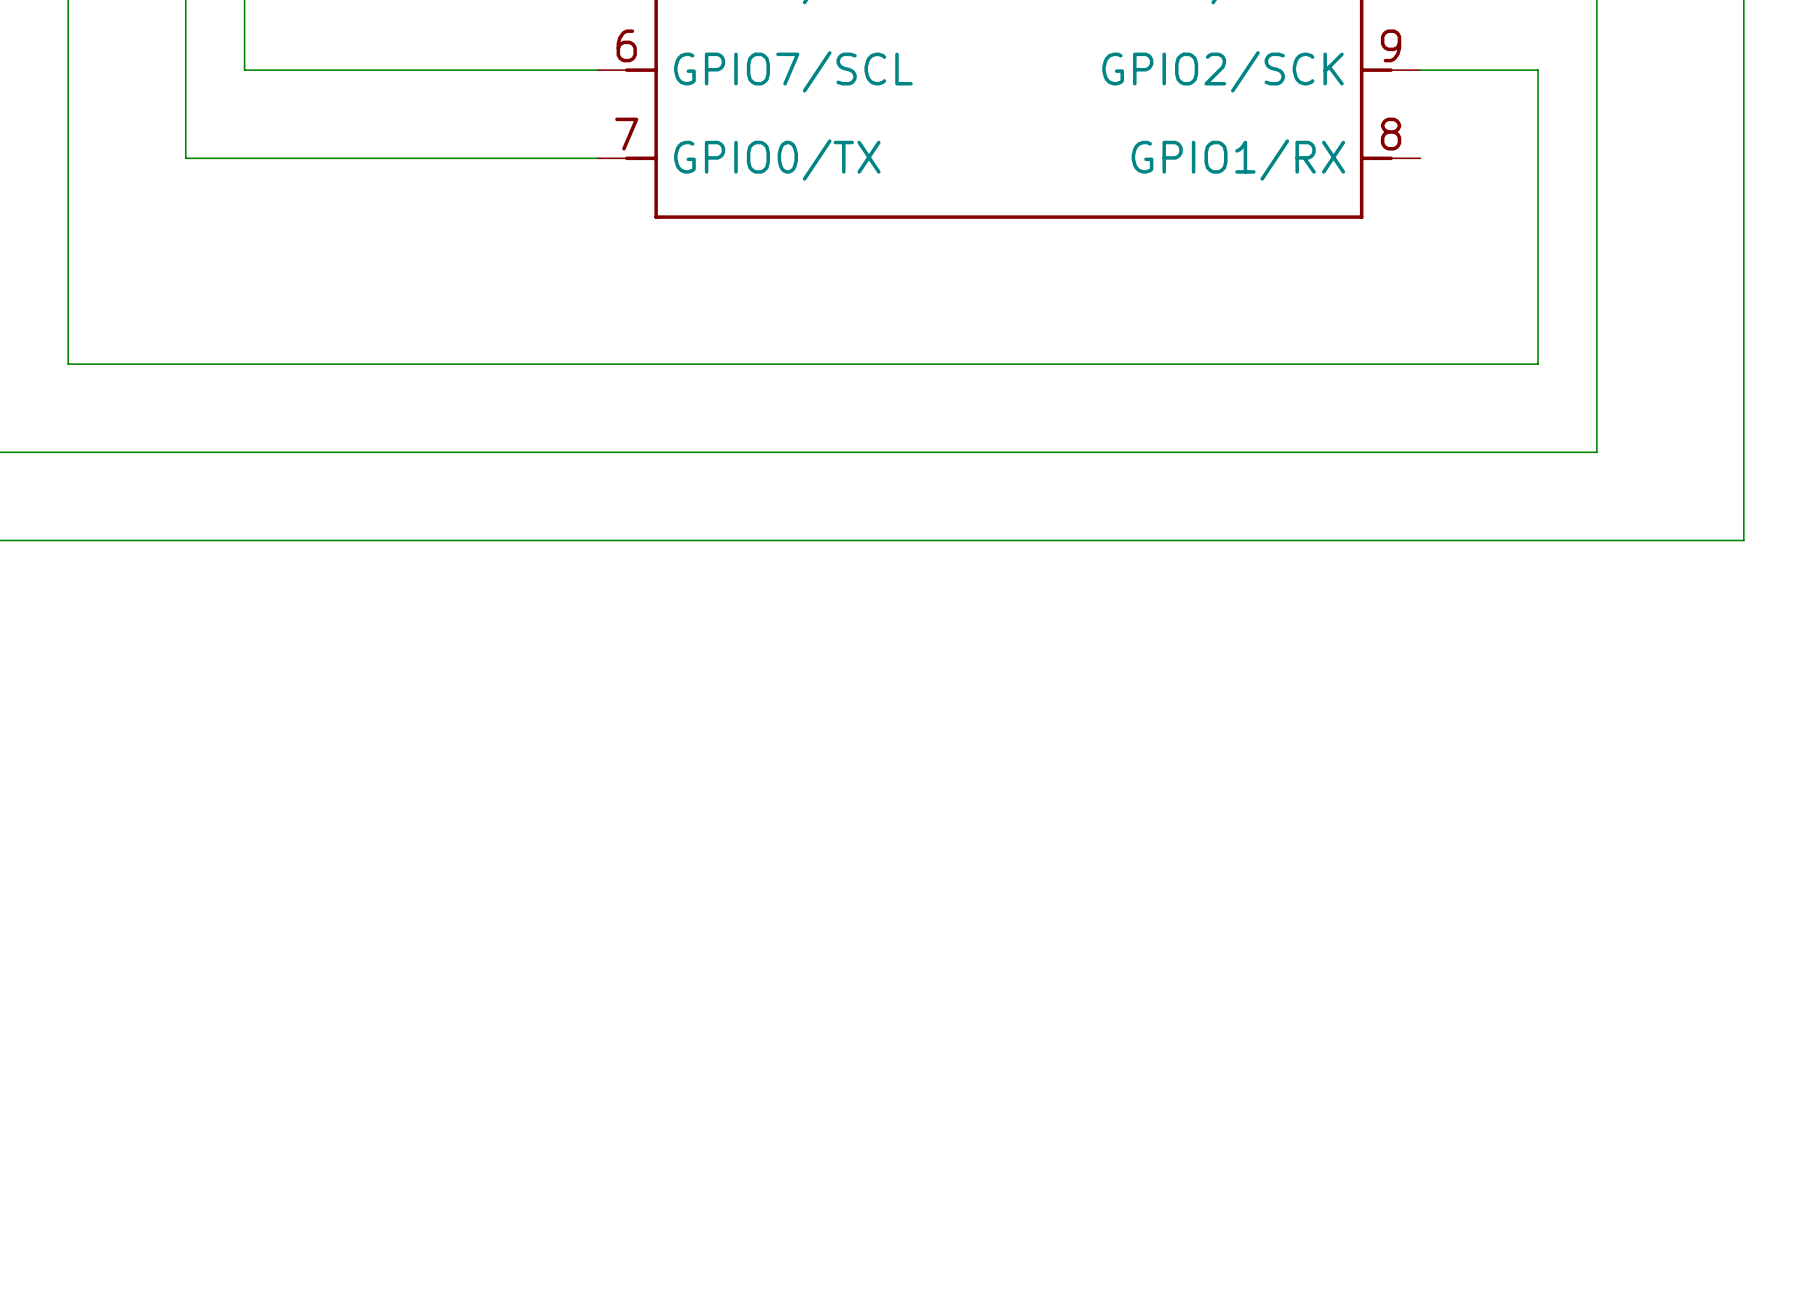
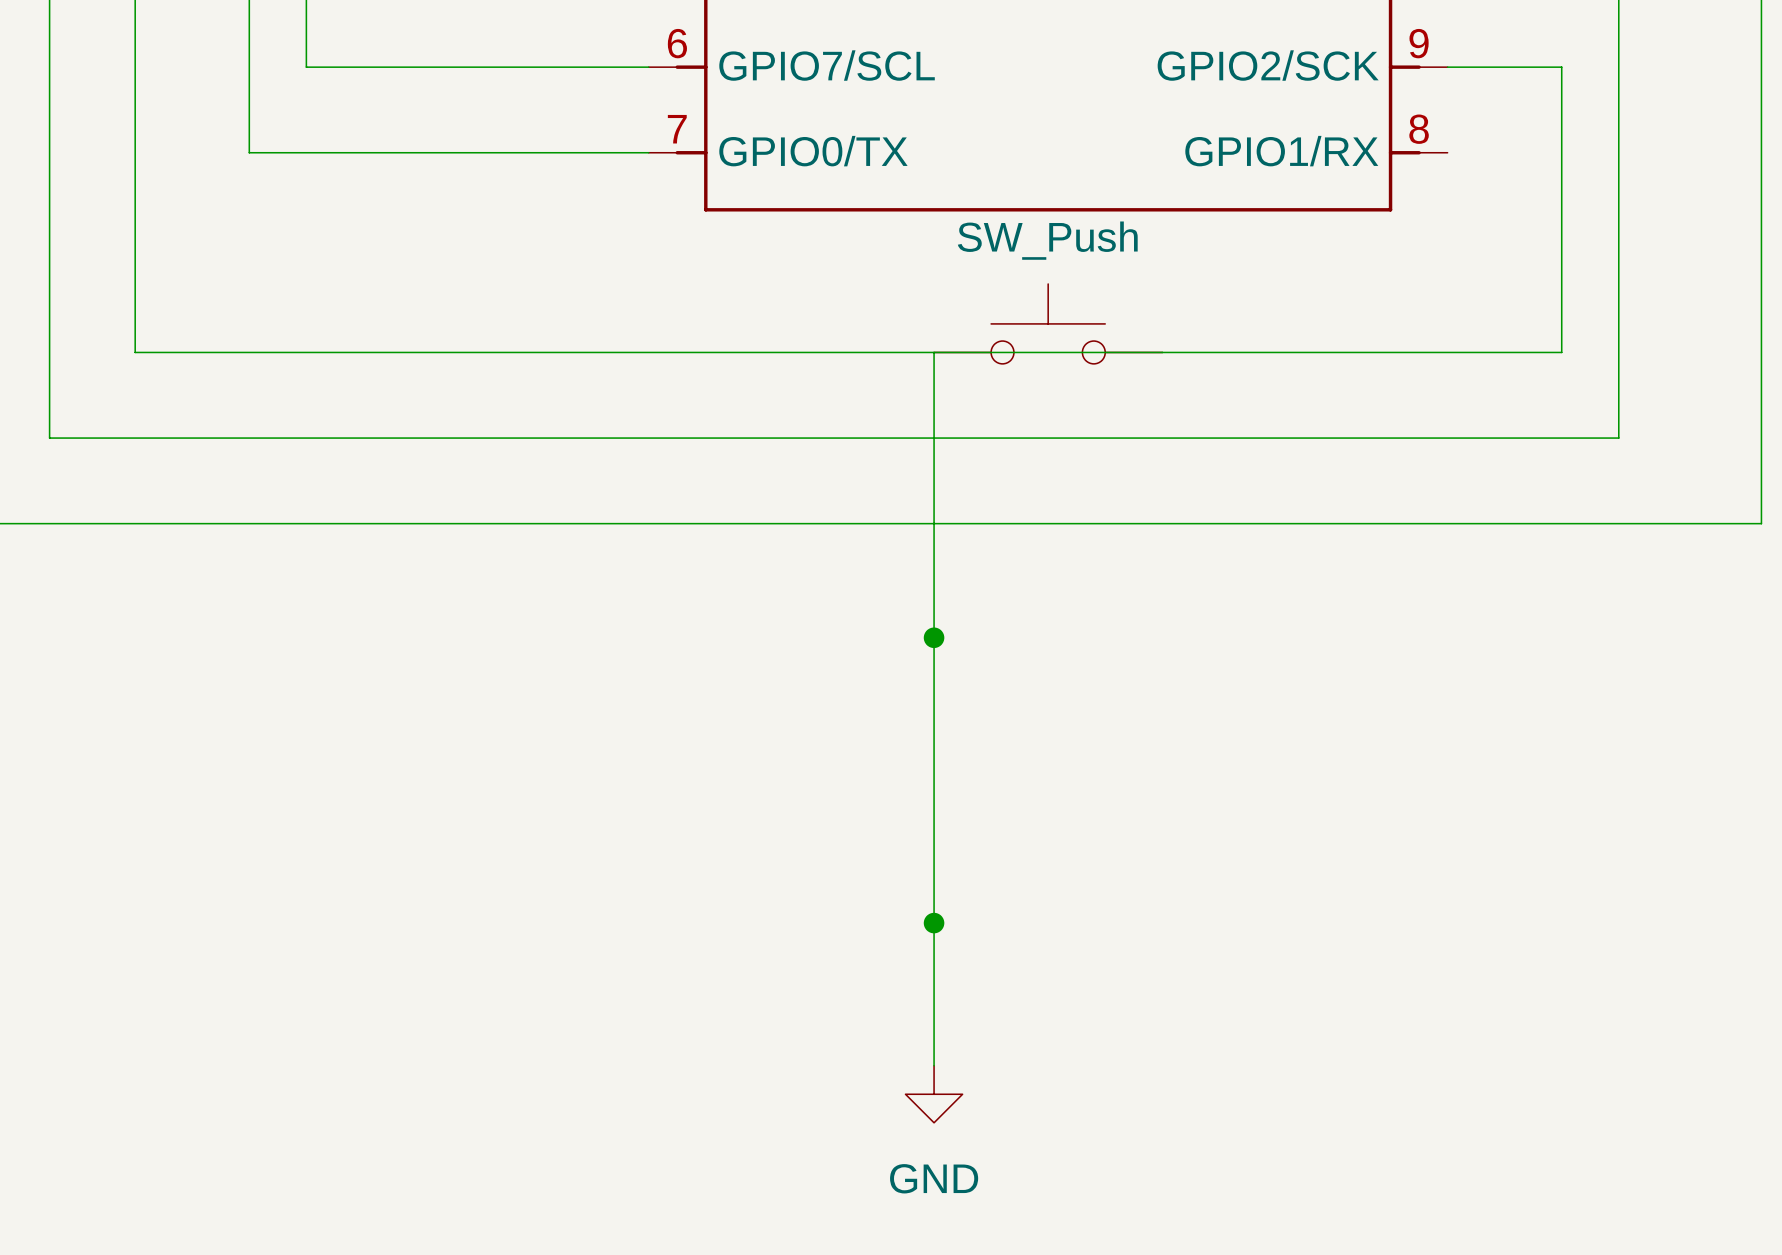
part: none -> SW_Push (1048, 323)
wire: none -> (934, 352) (934, 1065)
junction: none -> (934, 637)
junction: none -> (934, 923)
power symbol: none -> GND (934, 1094)

